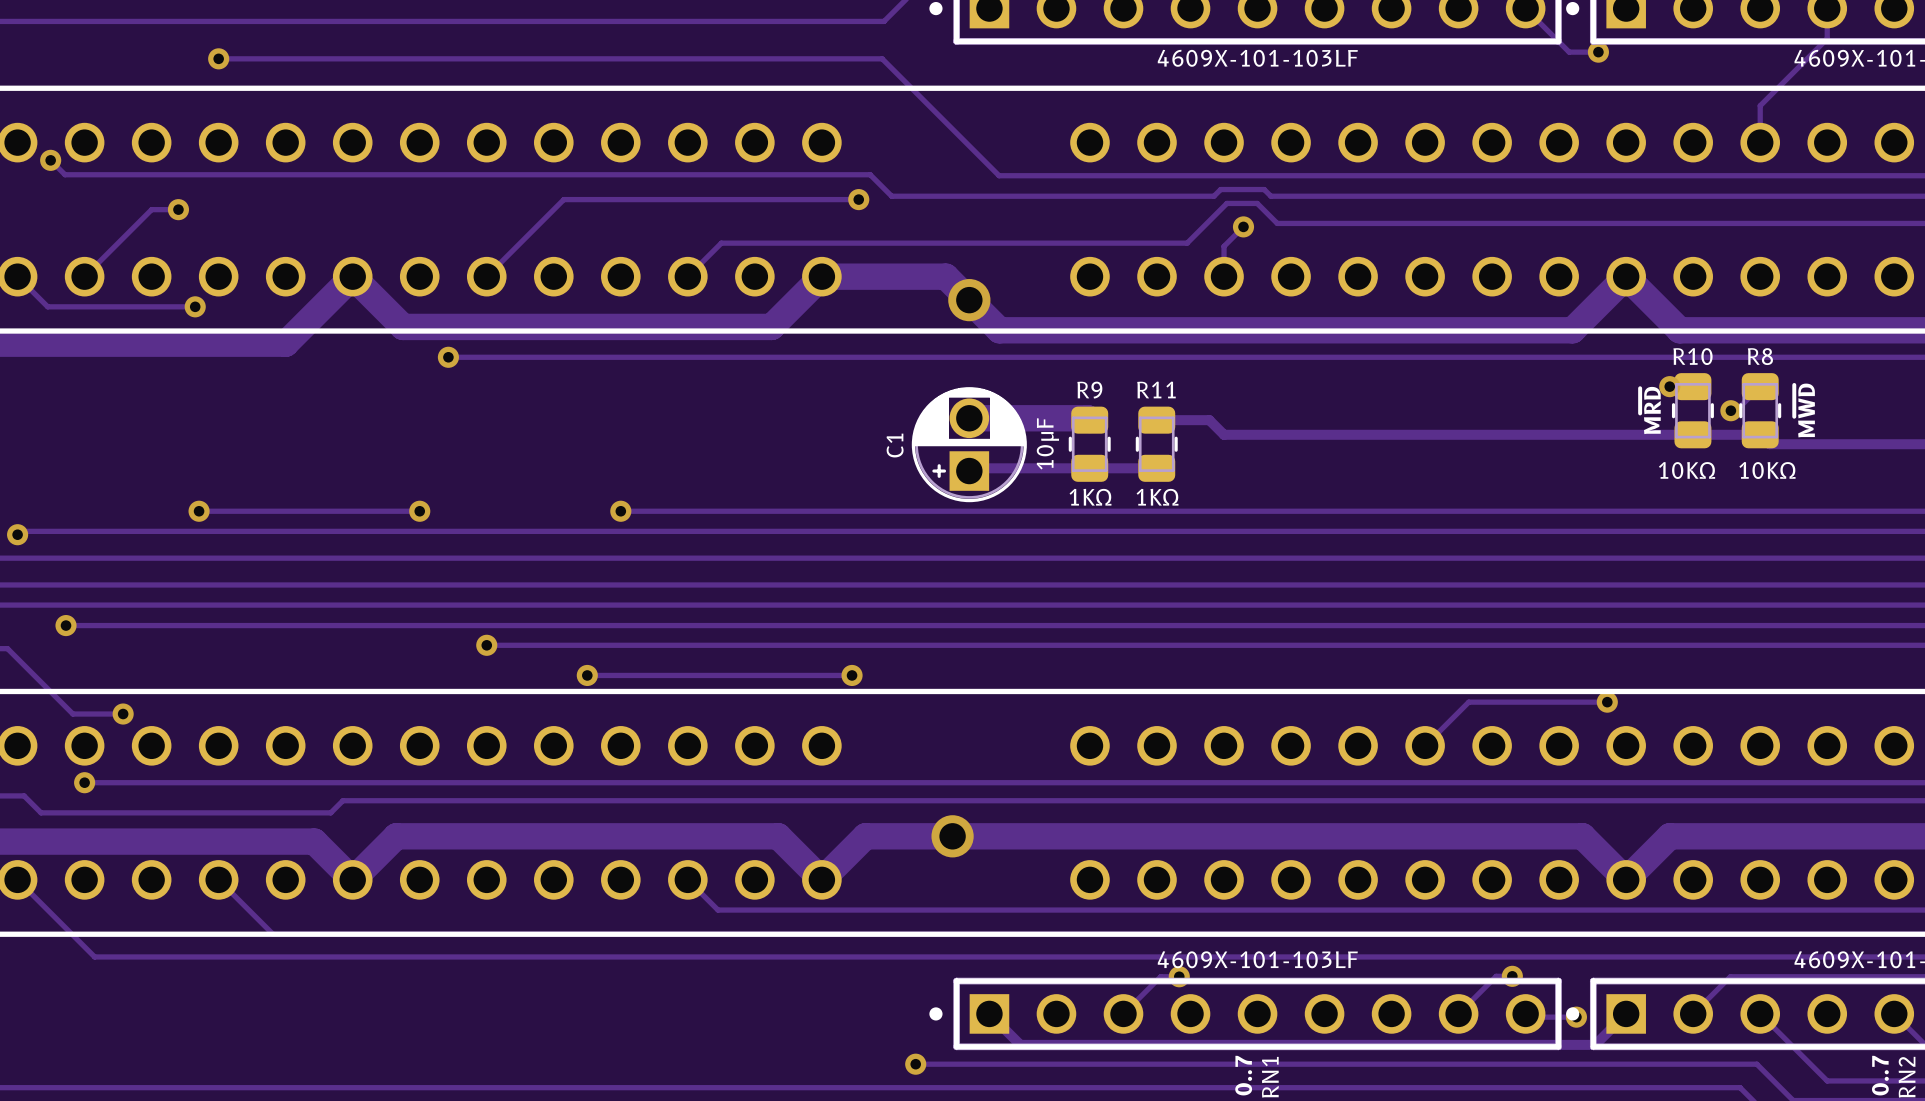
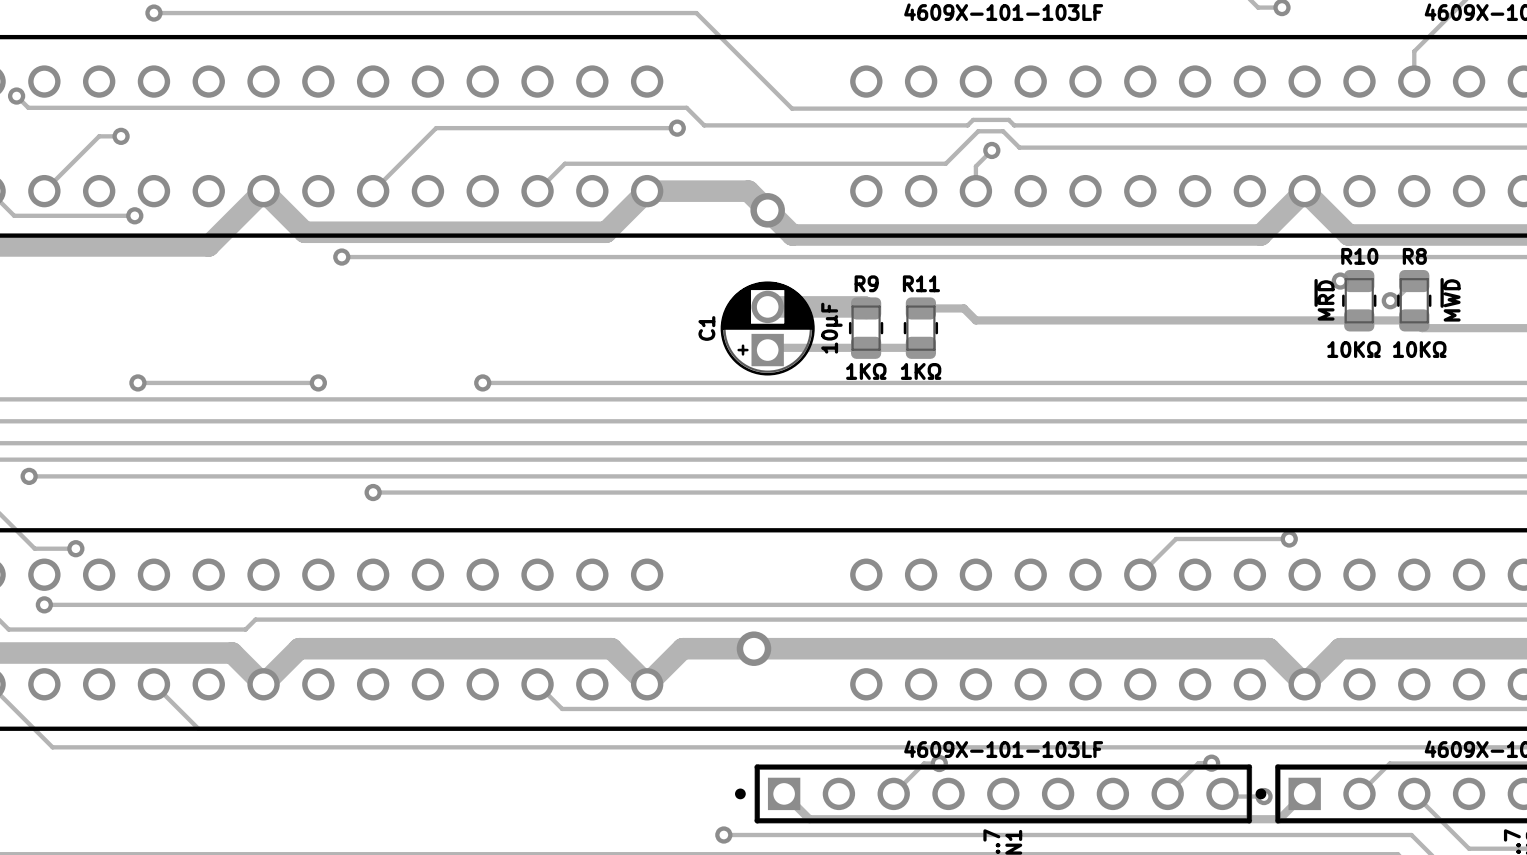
track: (587, 675) (852, 675) -> none
via: (587, 675) -> none
via: (852, 675) -> none

